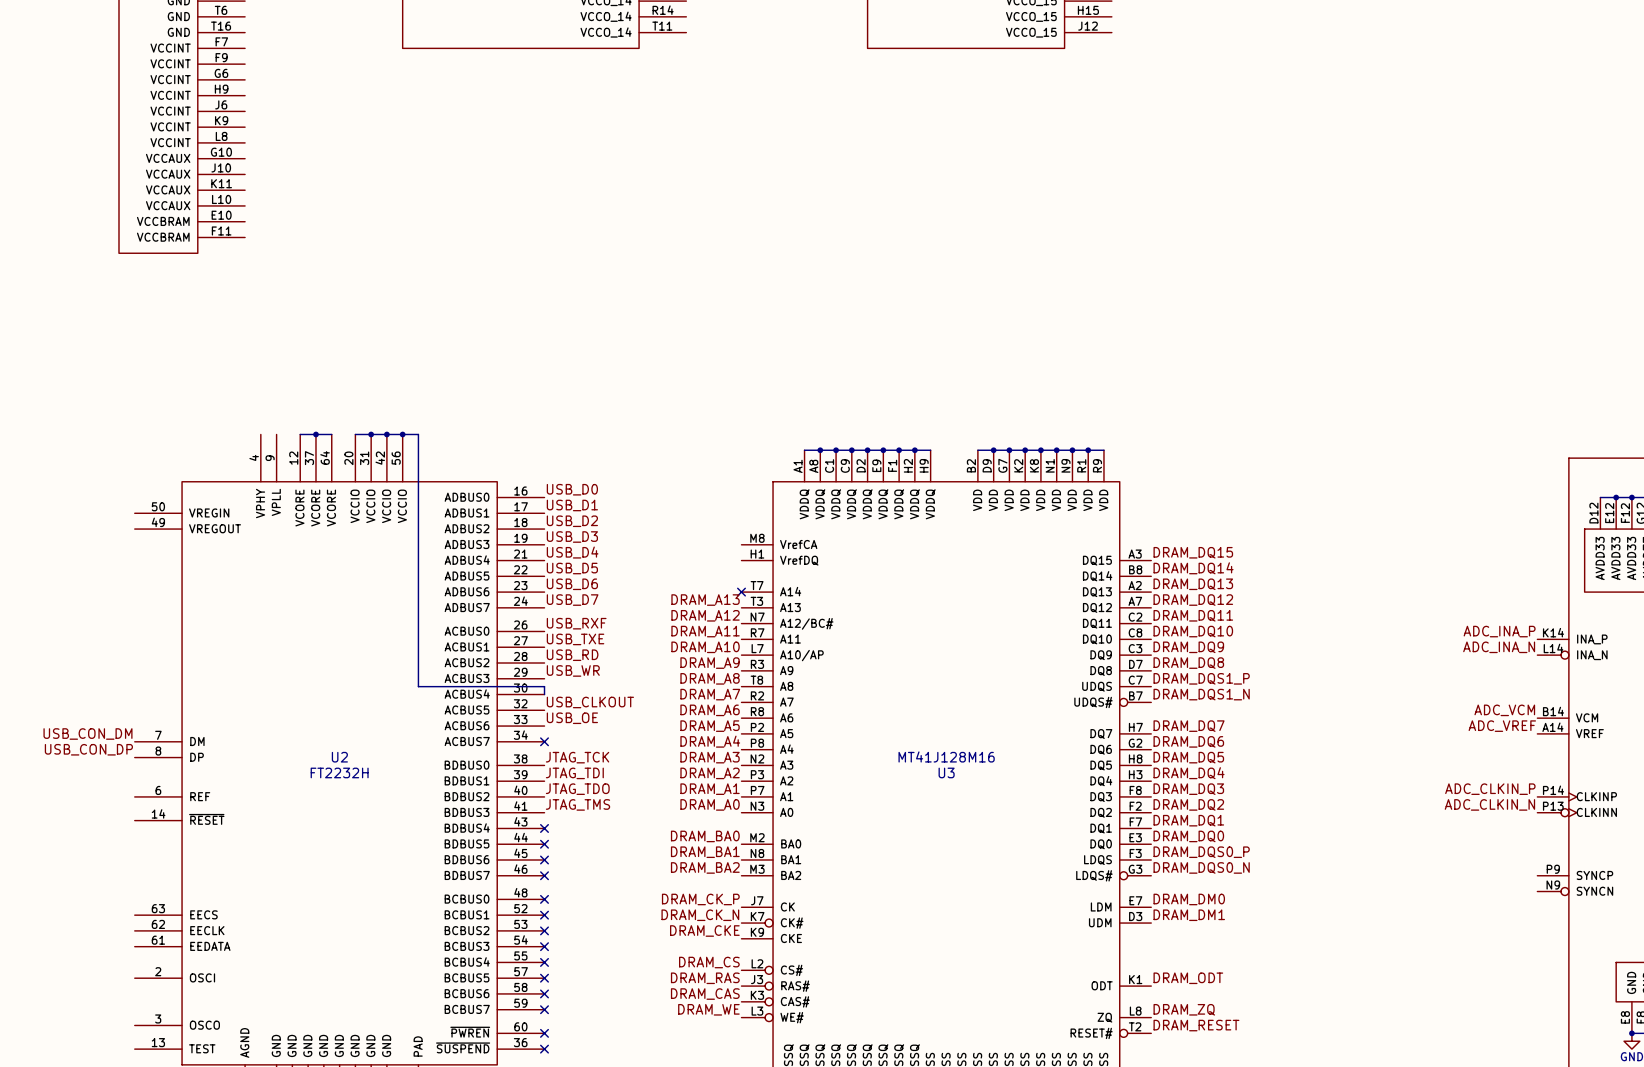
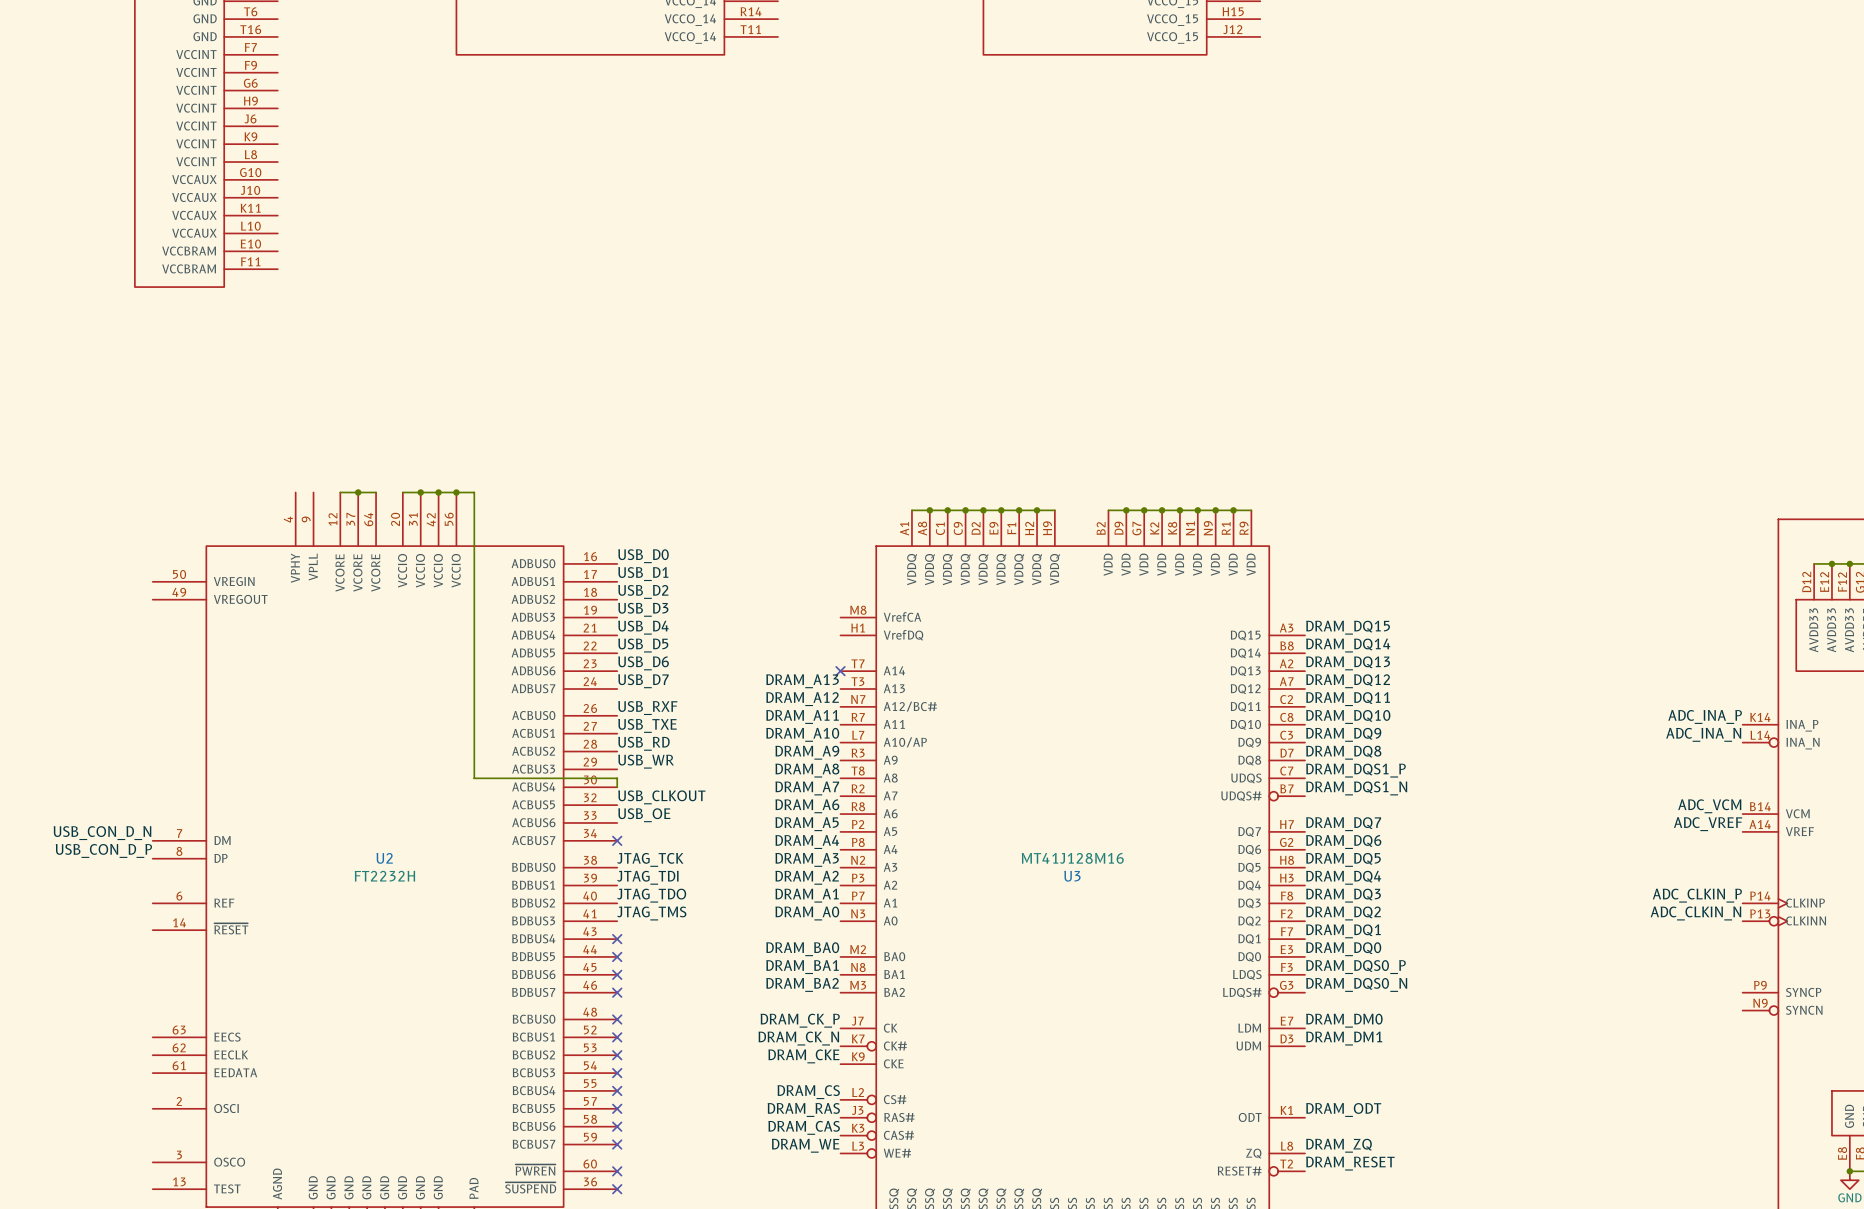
label: USB_CON_DM (87, 734) -> USB_CON_D_N (102, 833)
label: USB_CON_DP (88, 749) -> USB_CON_D_P (103, 850)

